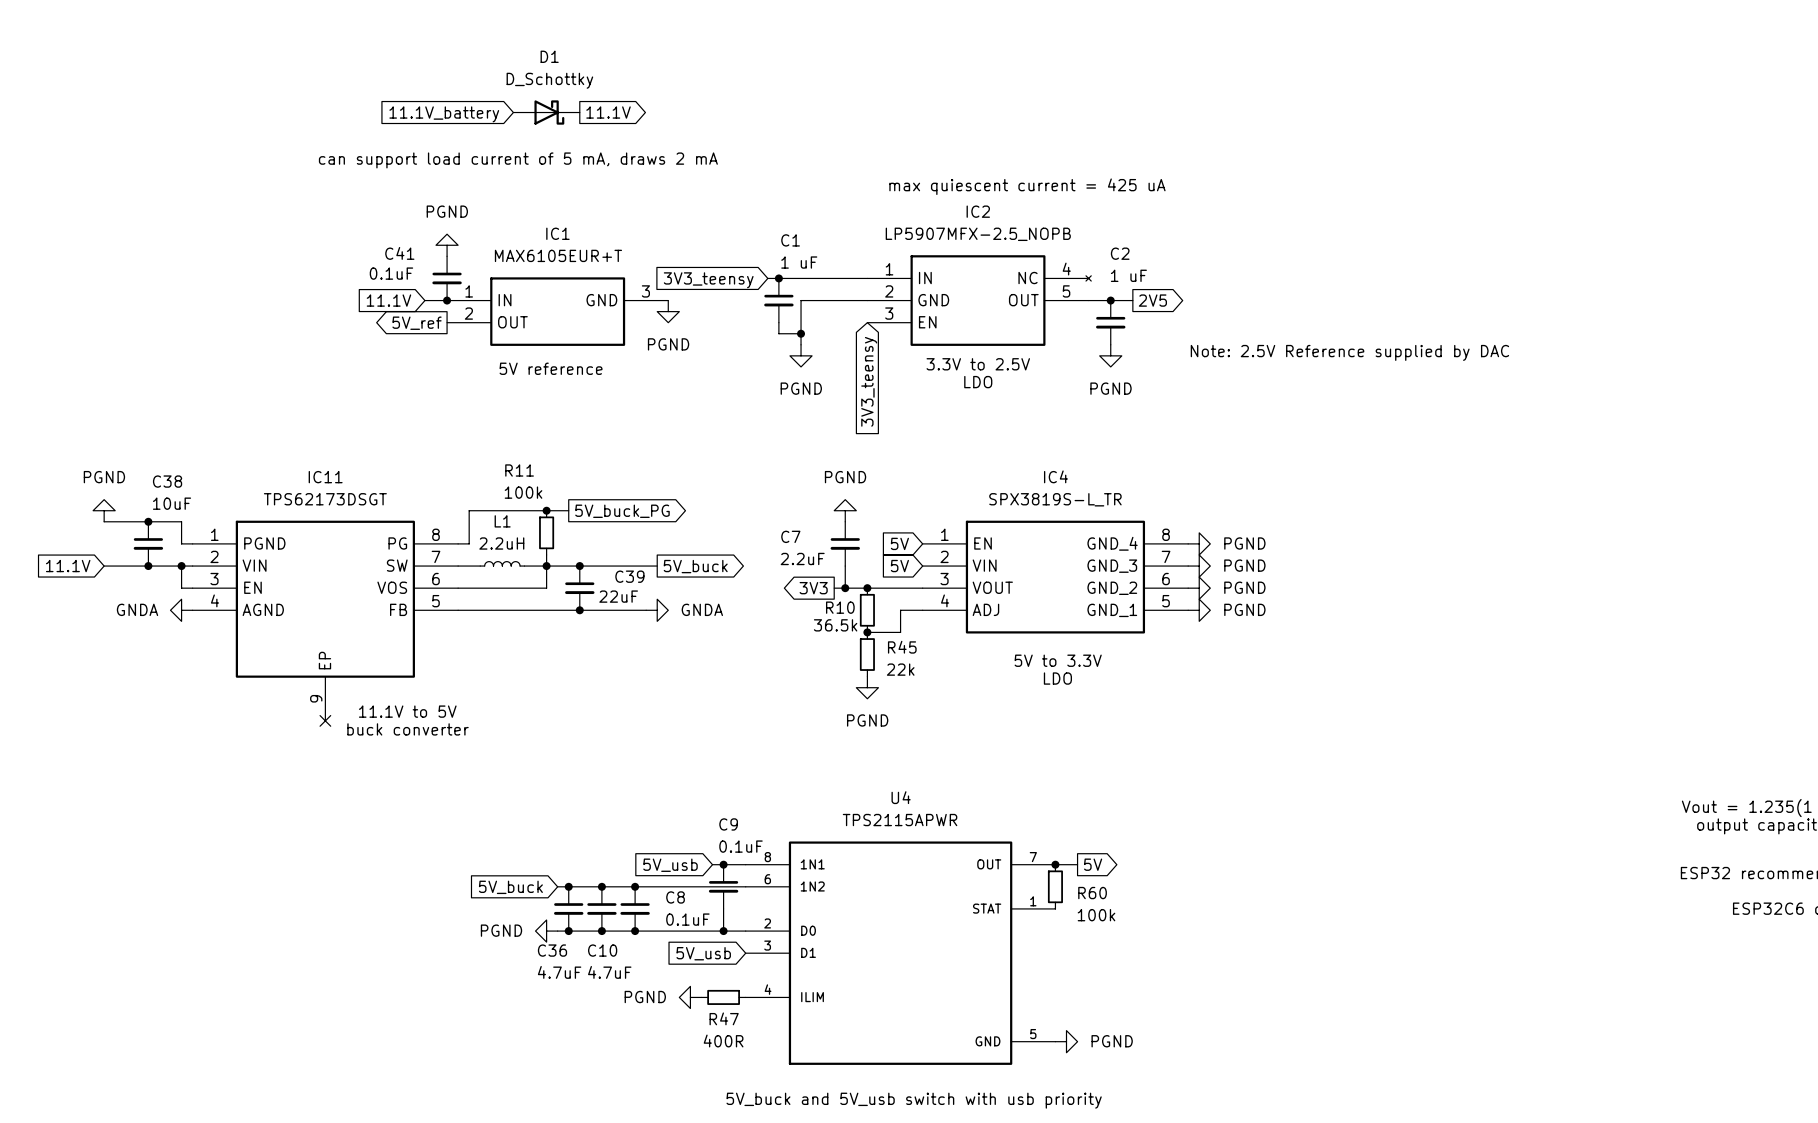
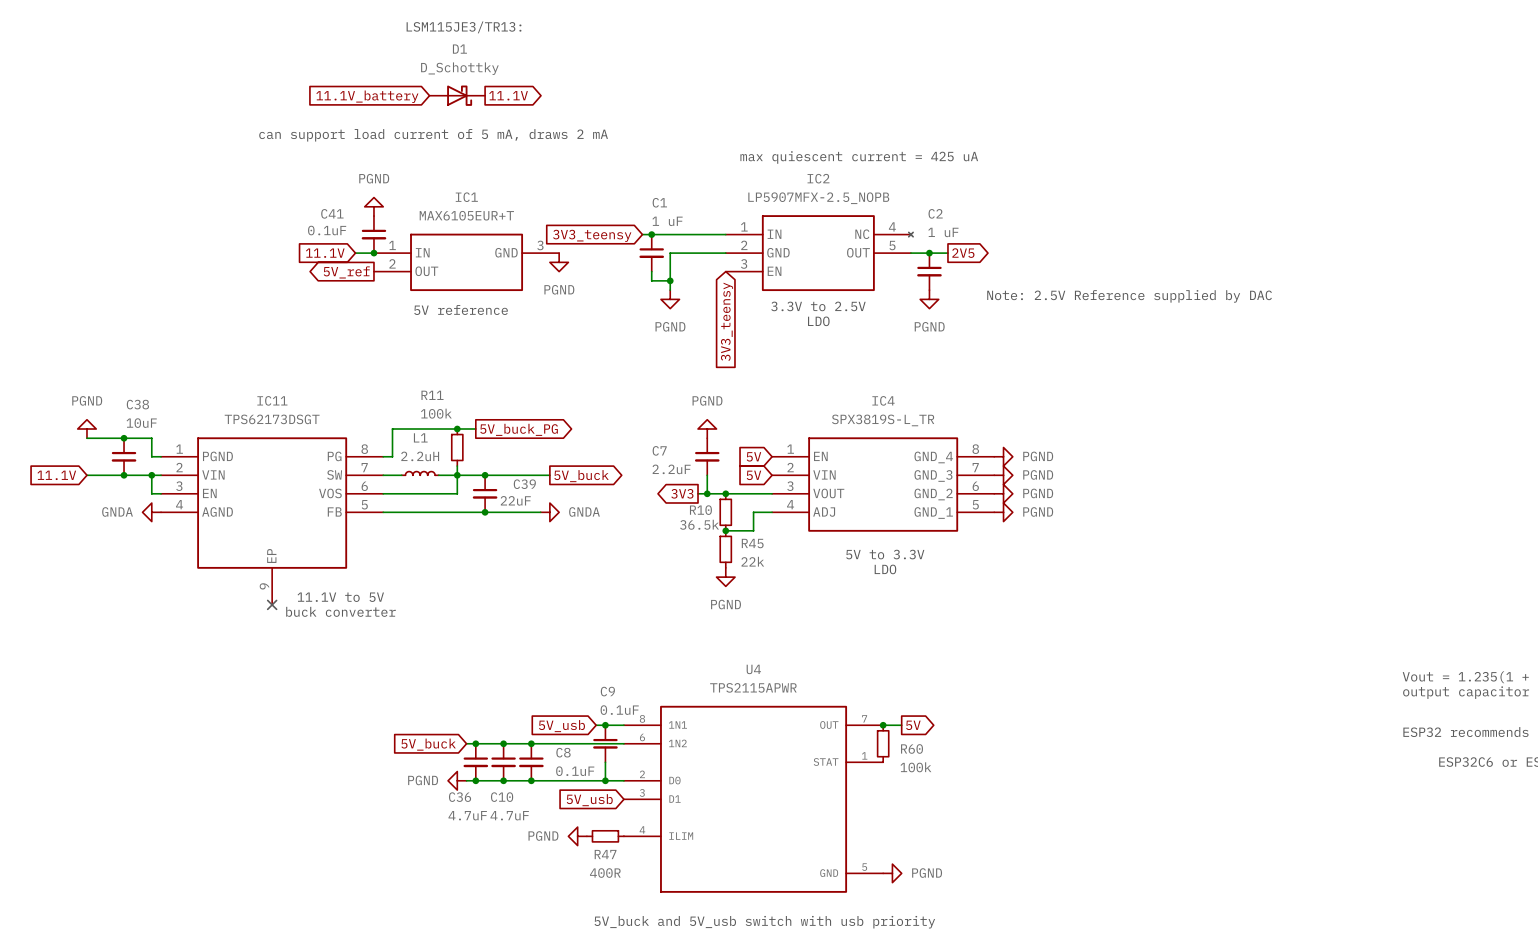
text: none -> LSM115JE3/TR13: (464, 27)

